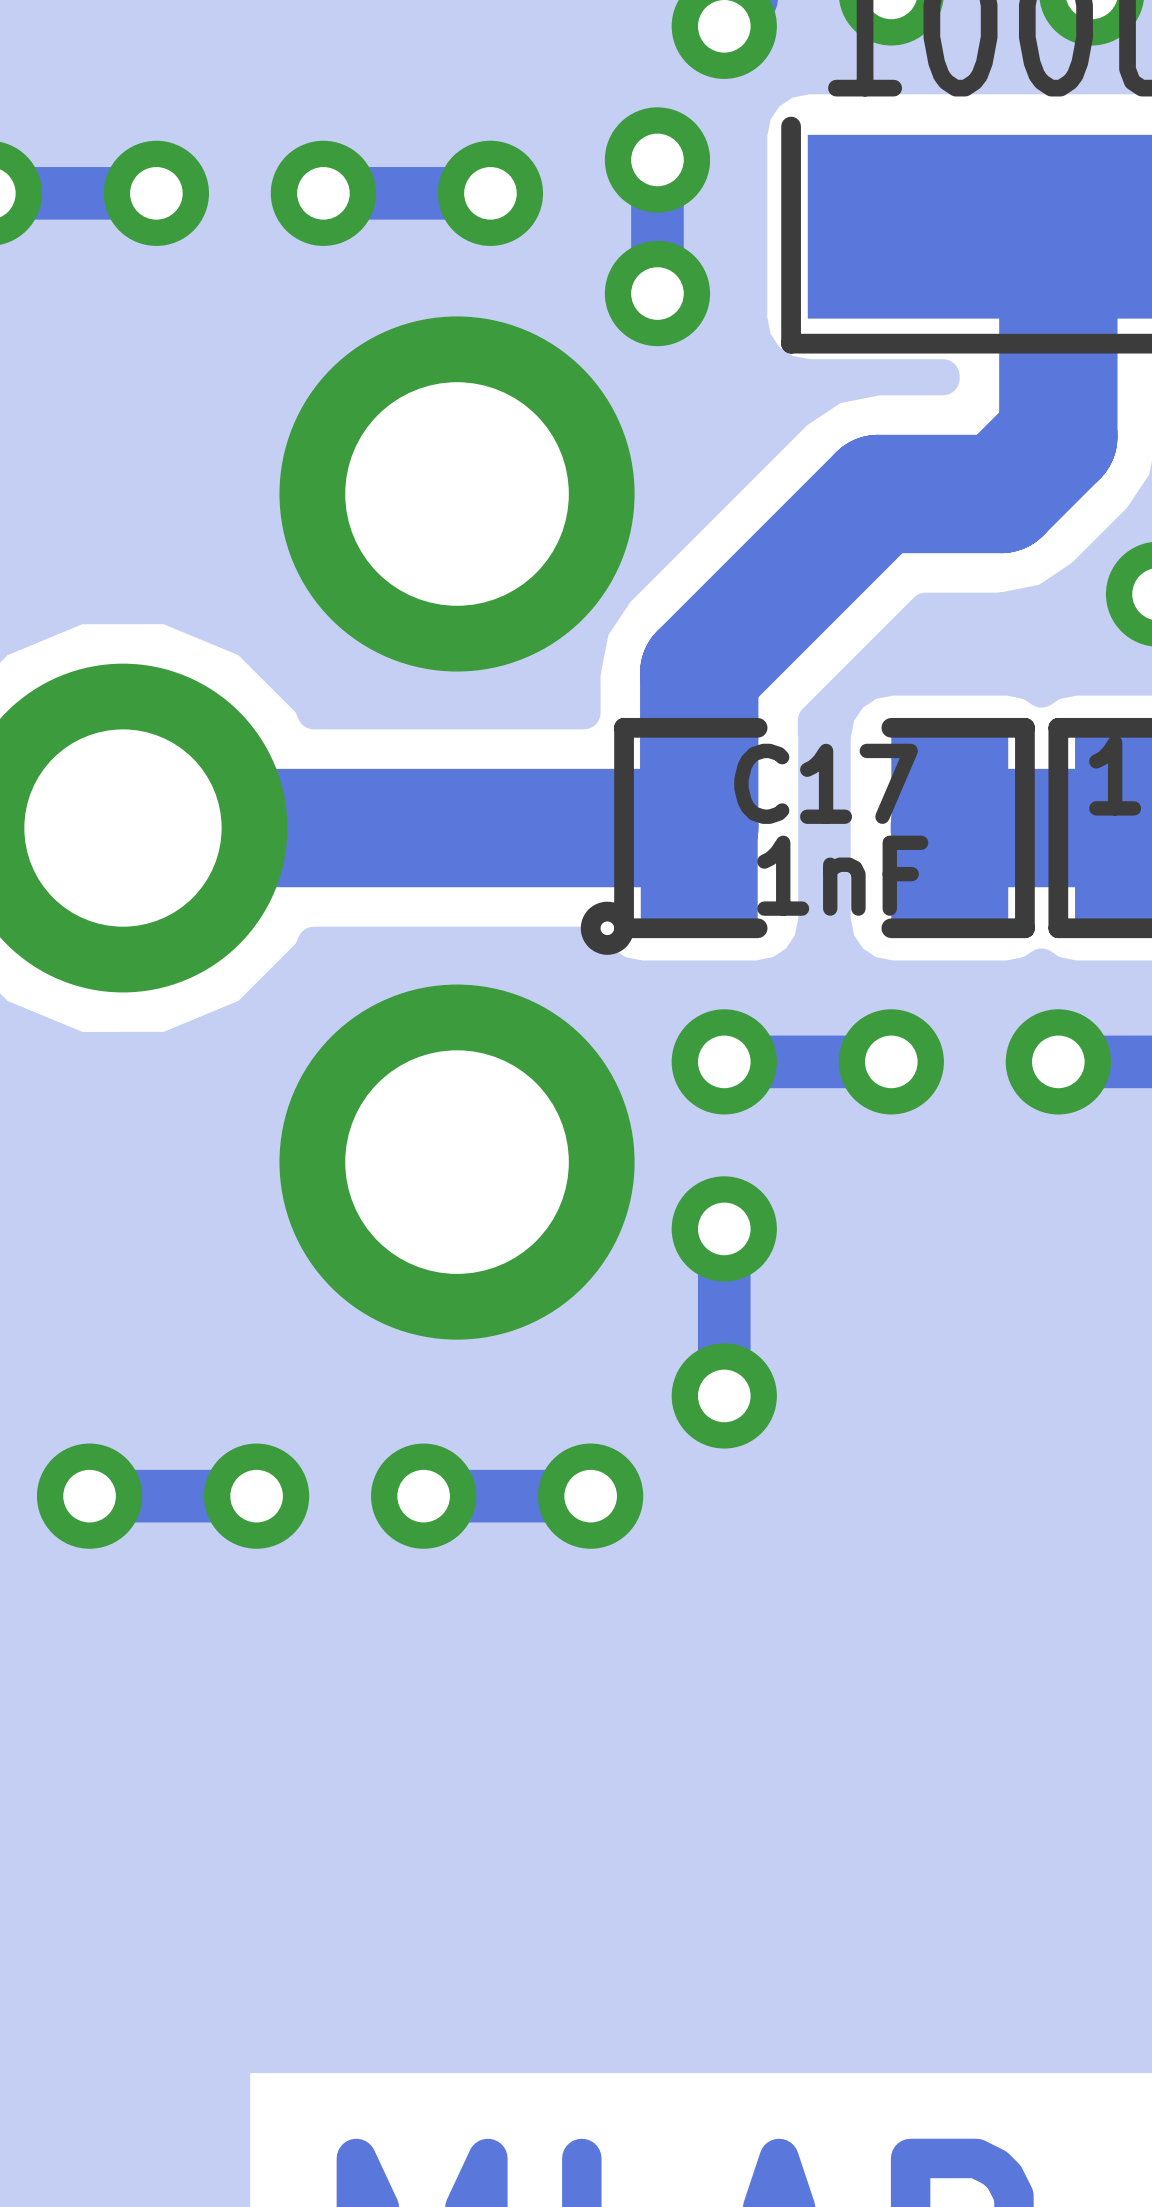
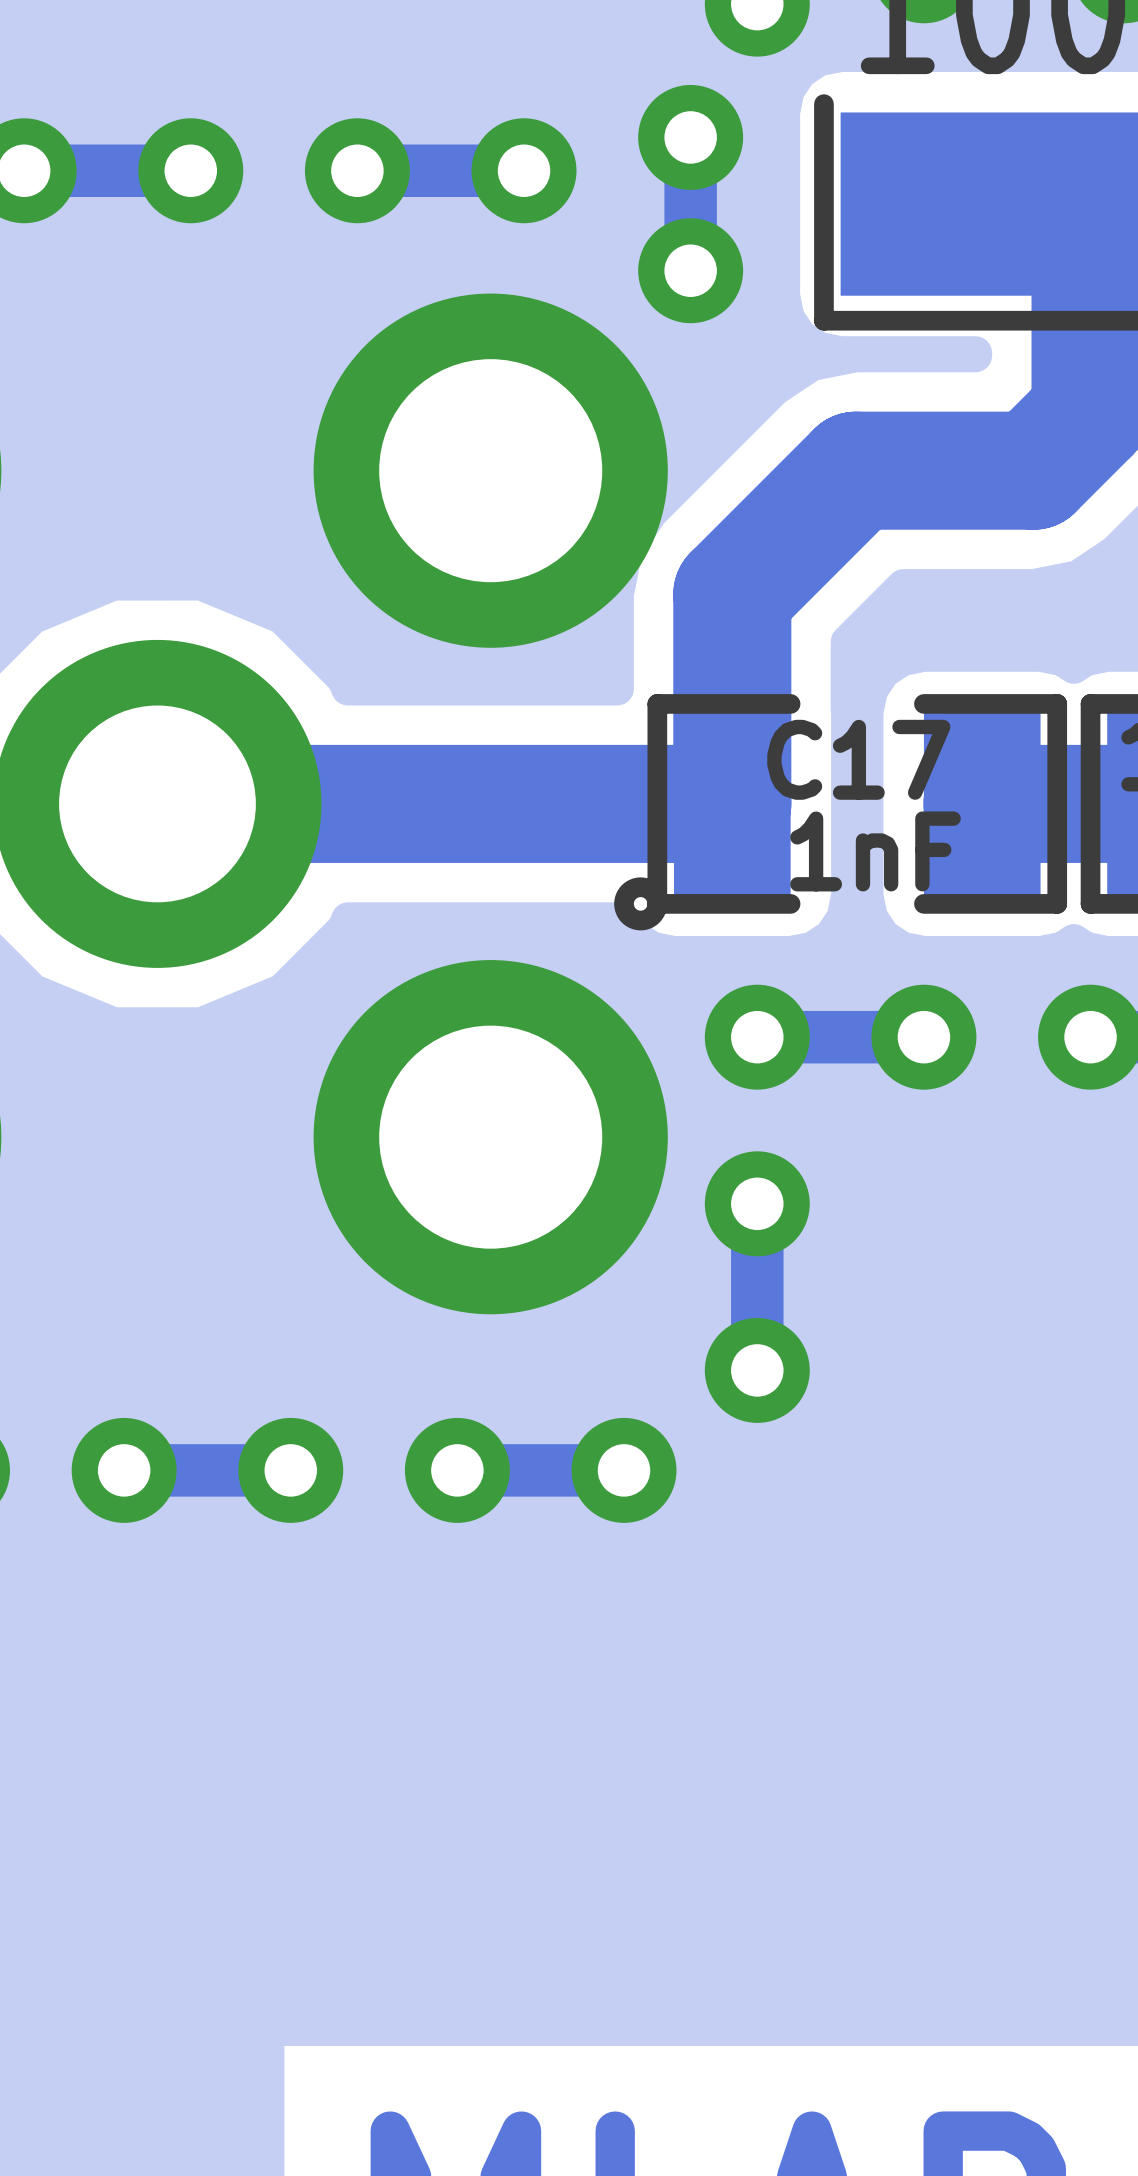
track: (877, 493) (699, 672) -> (910, 470) (855, 470) (732, 594) (732, 648)

